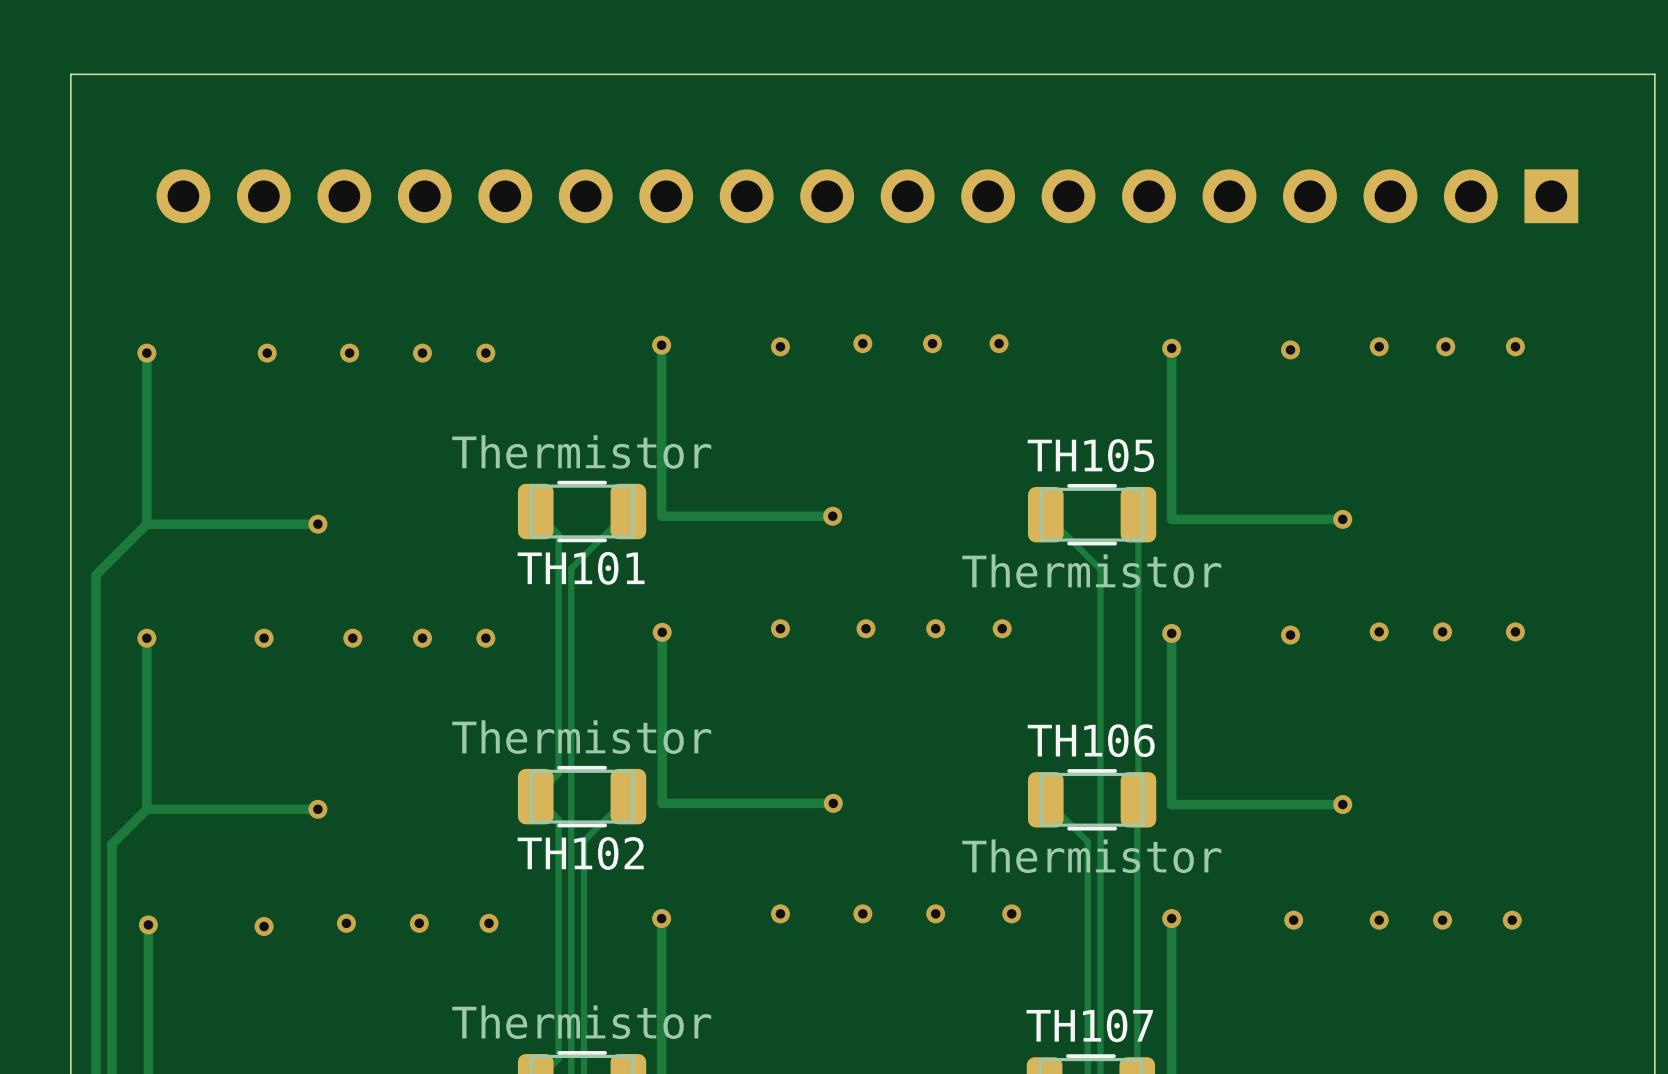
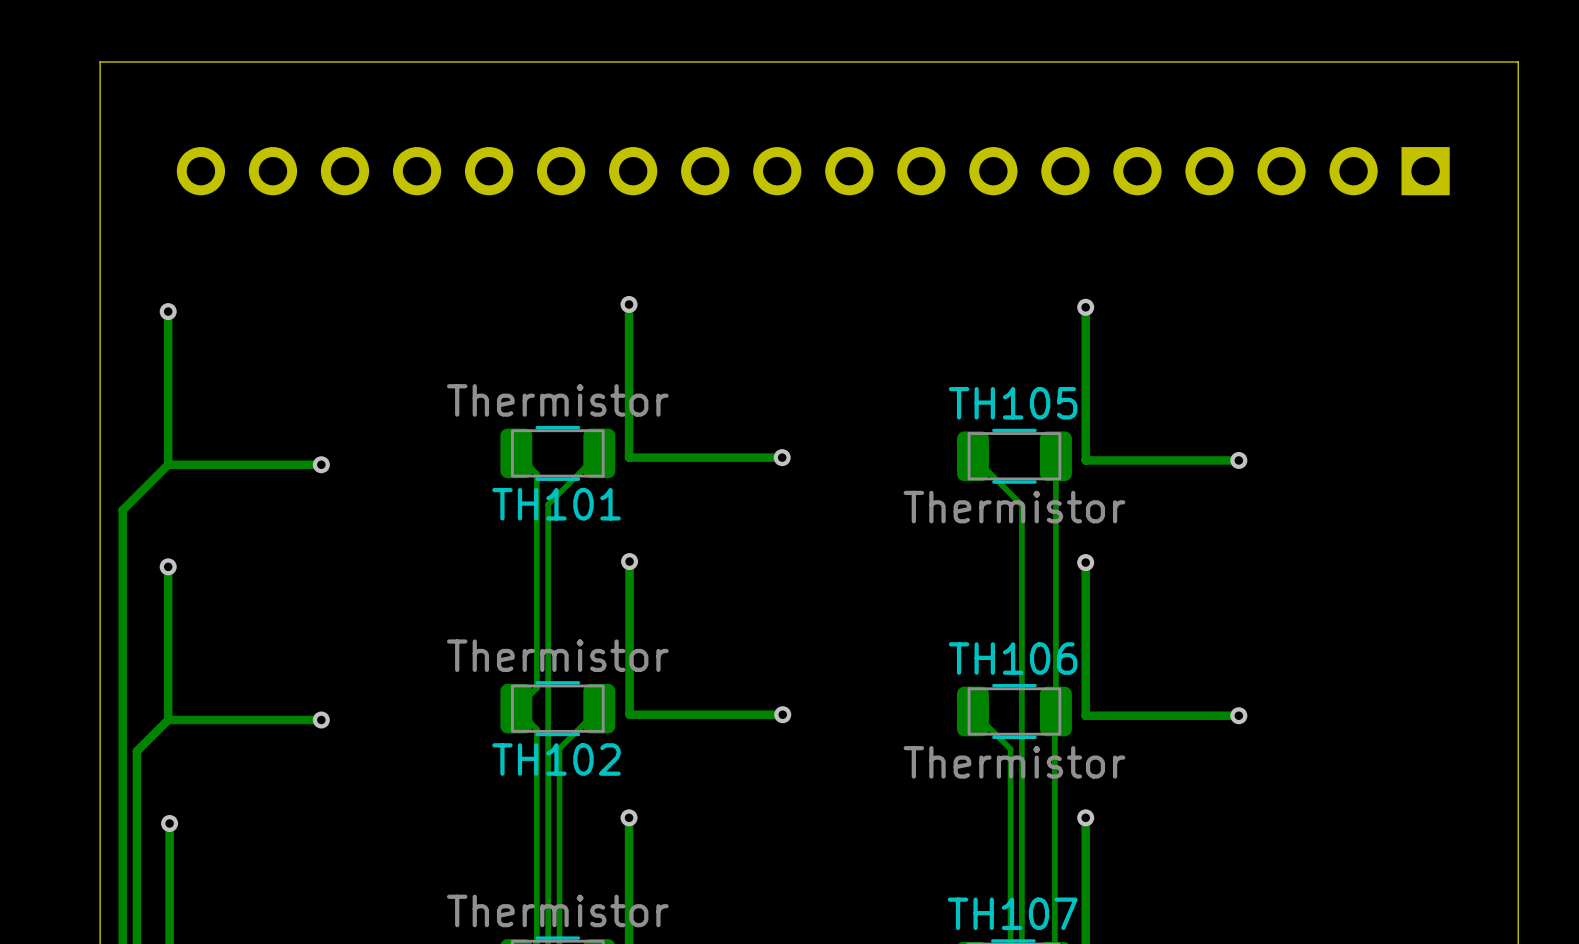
via: (862, 343) -> none
via: (932, 343) -> none
via: (999, 343) -> none
via: (780, 346) -> none
via: (1379, 346) -> none
via: (1445, 346) -> none
via: (1515, 346) -> none
via: (1290, 349) -> none
via: (267, 353) -> none
via: (349, 353) -> none
via: (422, 353) -> none
via: (485, 353) -> none
via: (780, 628) -> none
via: (866, 628) -> none
via: (935, 628) -> none
via: (1002, 628) -> none
via: (1379, 631) -> none
via: (1442, 631) -> none
via: (1515, 631) -> none
via: (1290, 635) -> none
via: (264, 638) -> none
via: (352, 638) -> none
via: (422, 638) -> none
via: (485, 638) -> none
via: (780, 913) -> none
via: (862, 913) -> none
via: (935, 913) -> none
via: (1011, 913) -> none
via: (1293, 920) -> none
via: (1379, 920) -> none
via: (1442, 920) -> none
via: (1512, 920) -> none
via: (346, 923) -> none
via: (419, 923) -> none
via: (489, 923) -> none
via: (264, 926) -> none

